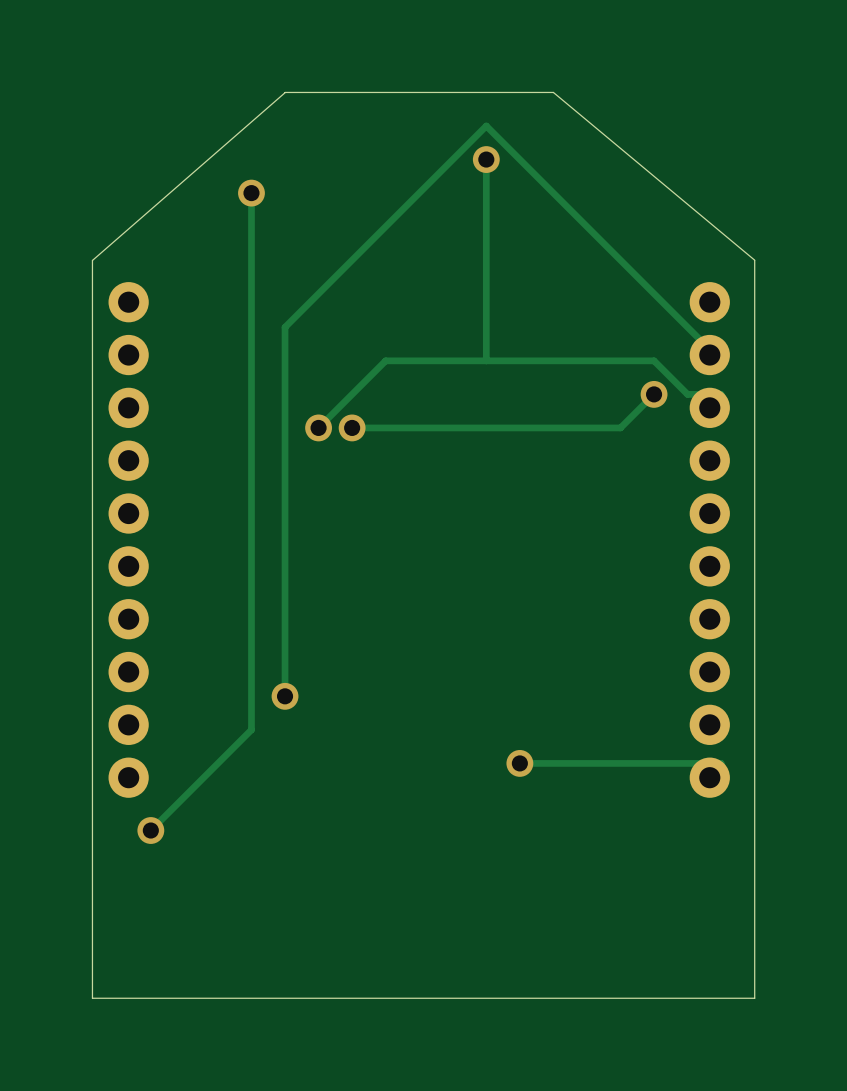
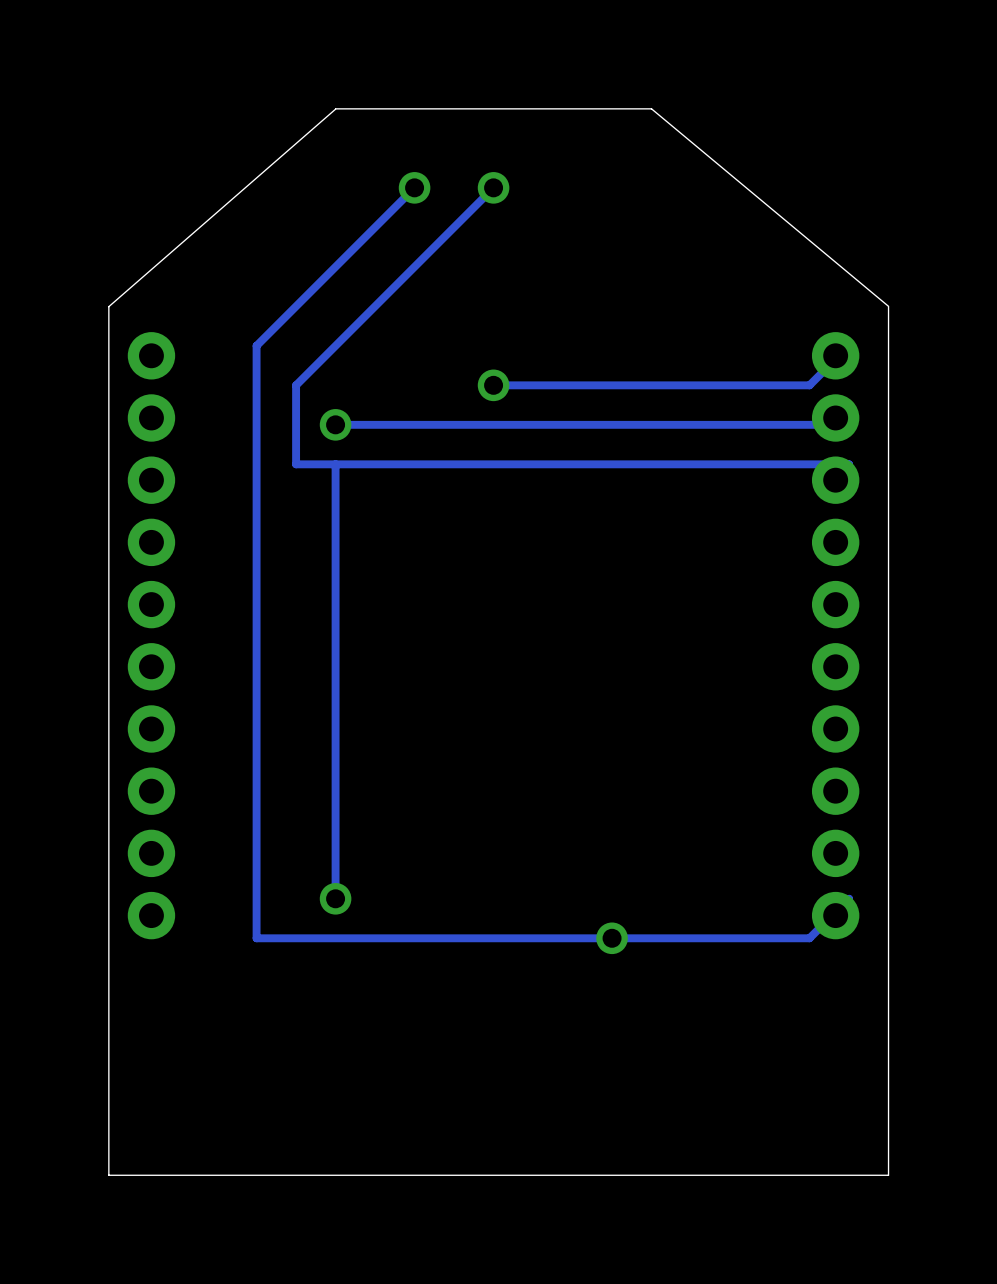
via: none -> (414, 187)
via: none -> (493, 187)
track: (486, 159) (486, 360) -> none
via: (486, 159) -> none
track: (251, 193) (251, 327) -> (493, 187) (296, 385)
via: (251, 193) -> none
track: none -> (835, 355) (849, 345) (809, 385) (493, 385)
via: none -> (493, 385)
via: none -> (335, 424)
track: (385, 360) (318, 427) -> (454, 424) (335, 424)
track: (654, 360) (687, 394) -> (770, 424) (849, 424)
track: (721, 360) (486, 126) (285, 327) (285, 394) -> none
track: (251, 394) (251, 729) (150, 830) -> (296, 464) (809, 464)
track: (654, 394) (620, 427) (352, 427) -> none
via: (654, 394) -> none
via: (318, 427) -> none
via: (352, 427) -> none
track: none -> (335, 819) (335, 898)
via position: (285, 696) -> (335, 898)
via position: (519, 763) -> (612, 938)
track: (721, 763) (519, 763) -> (849, 898) (809, 938) (256, 938) (256, 345) (414, 187)
via: (150, 830) -> none

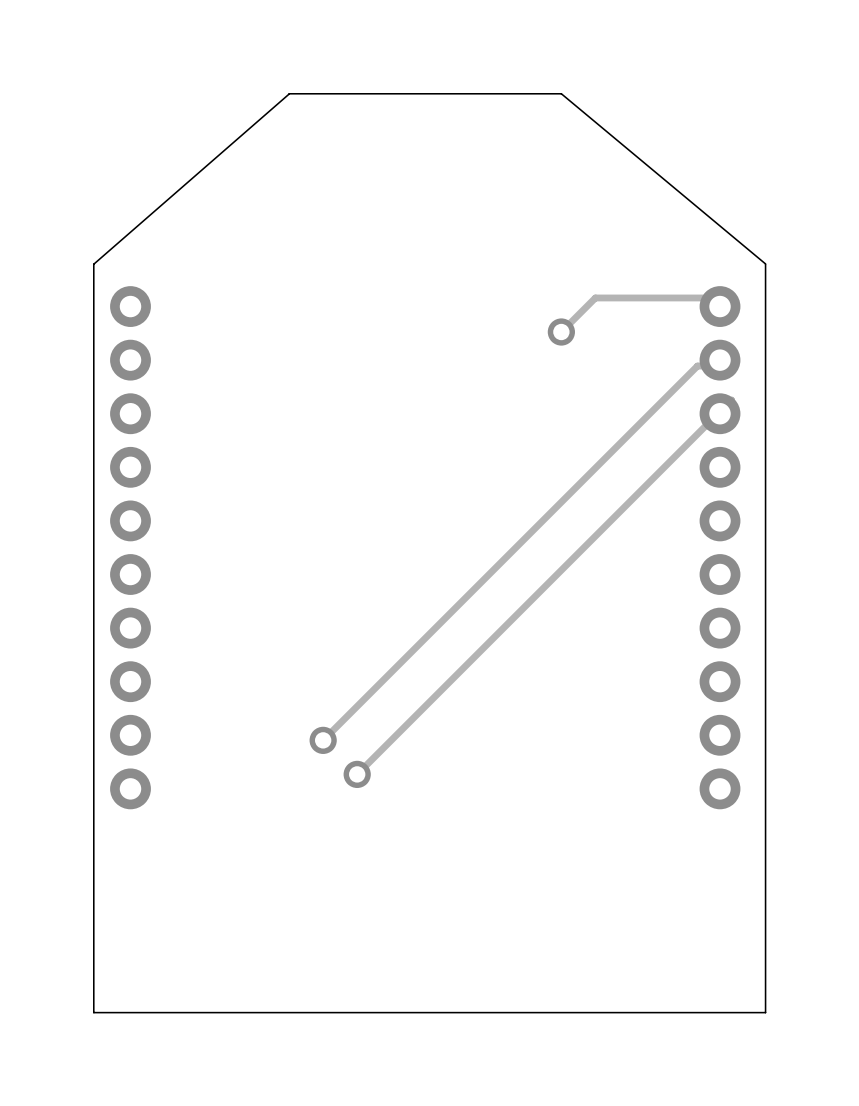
track: (414, 187) (256, 345) (256, 938) (809, 938) (849, 898) (835, 915) -> none
via: (414, 187) -> none
track: (493, 187) (296, 385) (296, 464) (849, 464) -> (357, 774) (731, 400)
via: (493, 187) -> none
track: (849, 345) (809, 385) (493, 385) -> (731, 297) (595, 297) (561, 332)
via: (493, 385) -> none
via: none -> (561, 332)
via: (335, 424) -> none
track: (809, 424) (335, 424) -> (697, 366) (323, 740)
track: (335, 464) (335, 898) -> none
via: none -> (323, 740)
via: (335, 898) -> none
via: none -> (357, 774)
via: (612, 938) -> none

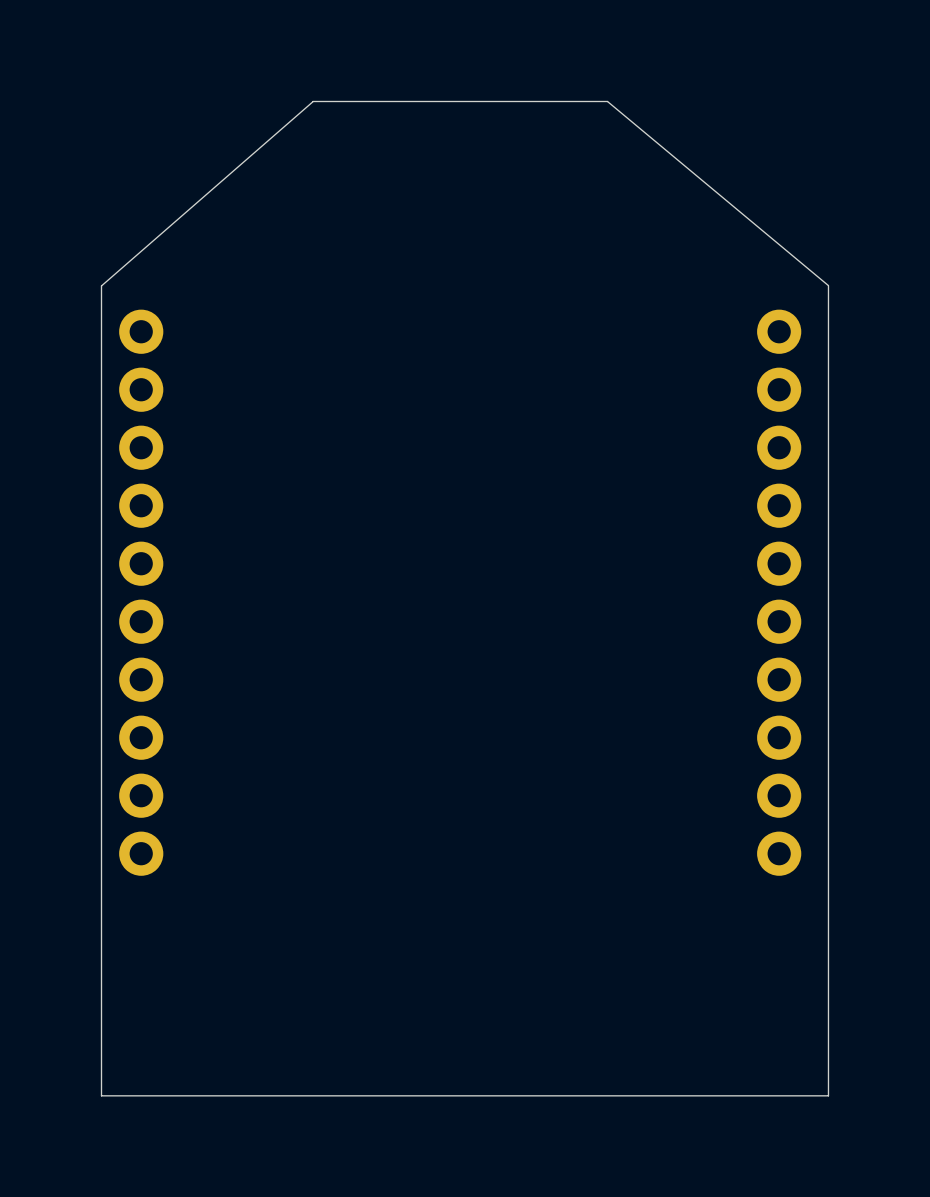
track: (720, 306) (731, 297) (595, 297) (561, 332) -> none
via: (561, 332) -> none
track: (720, 360) (731, 366) (697, 366) (323, 740) -> none
track: (720, 413) (731, 400) (357, 774) -> none
via: (323, 740) -> none
via: (357, 774) -> none

